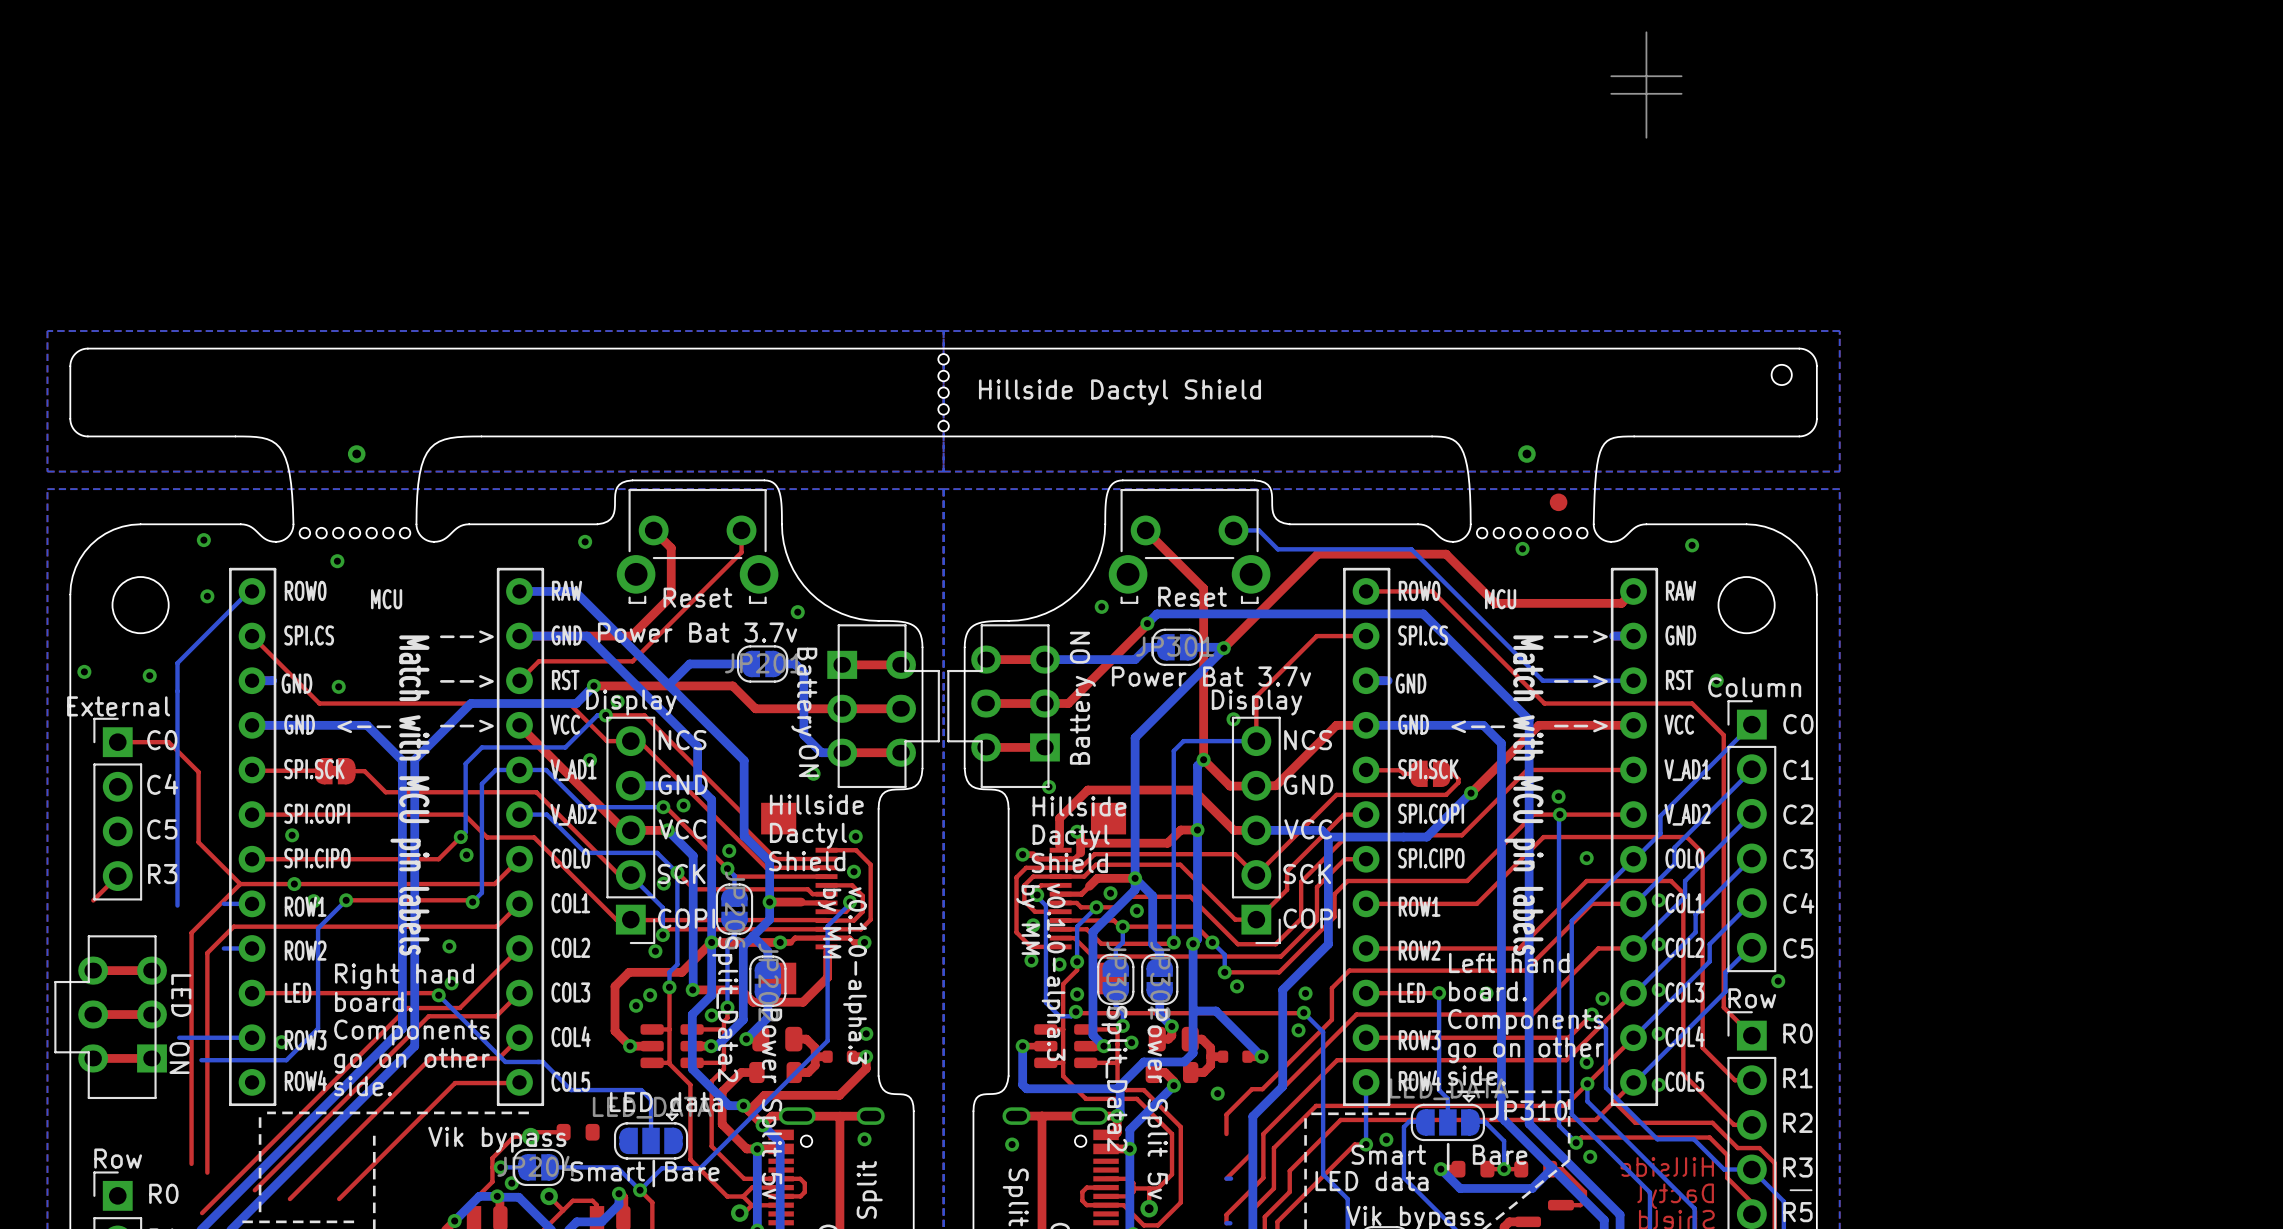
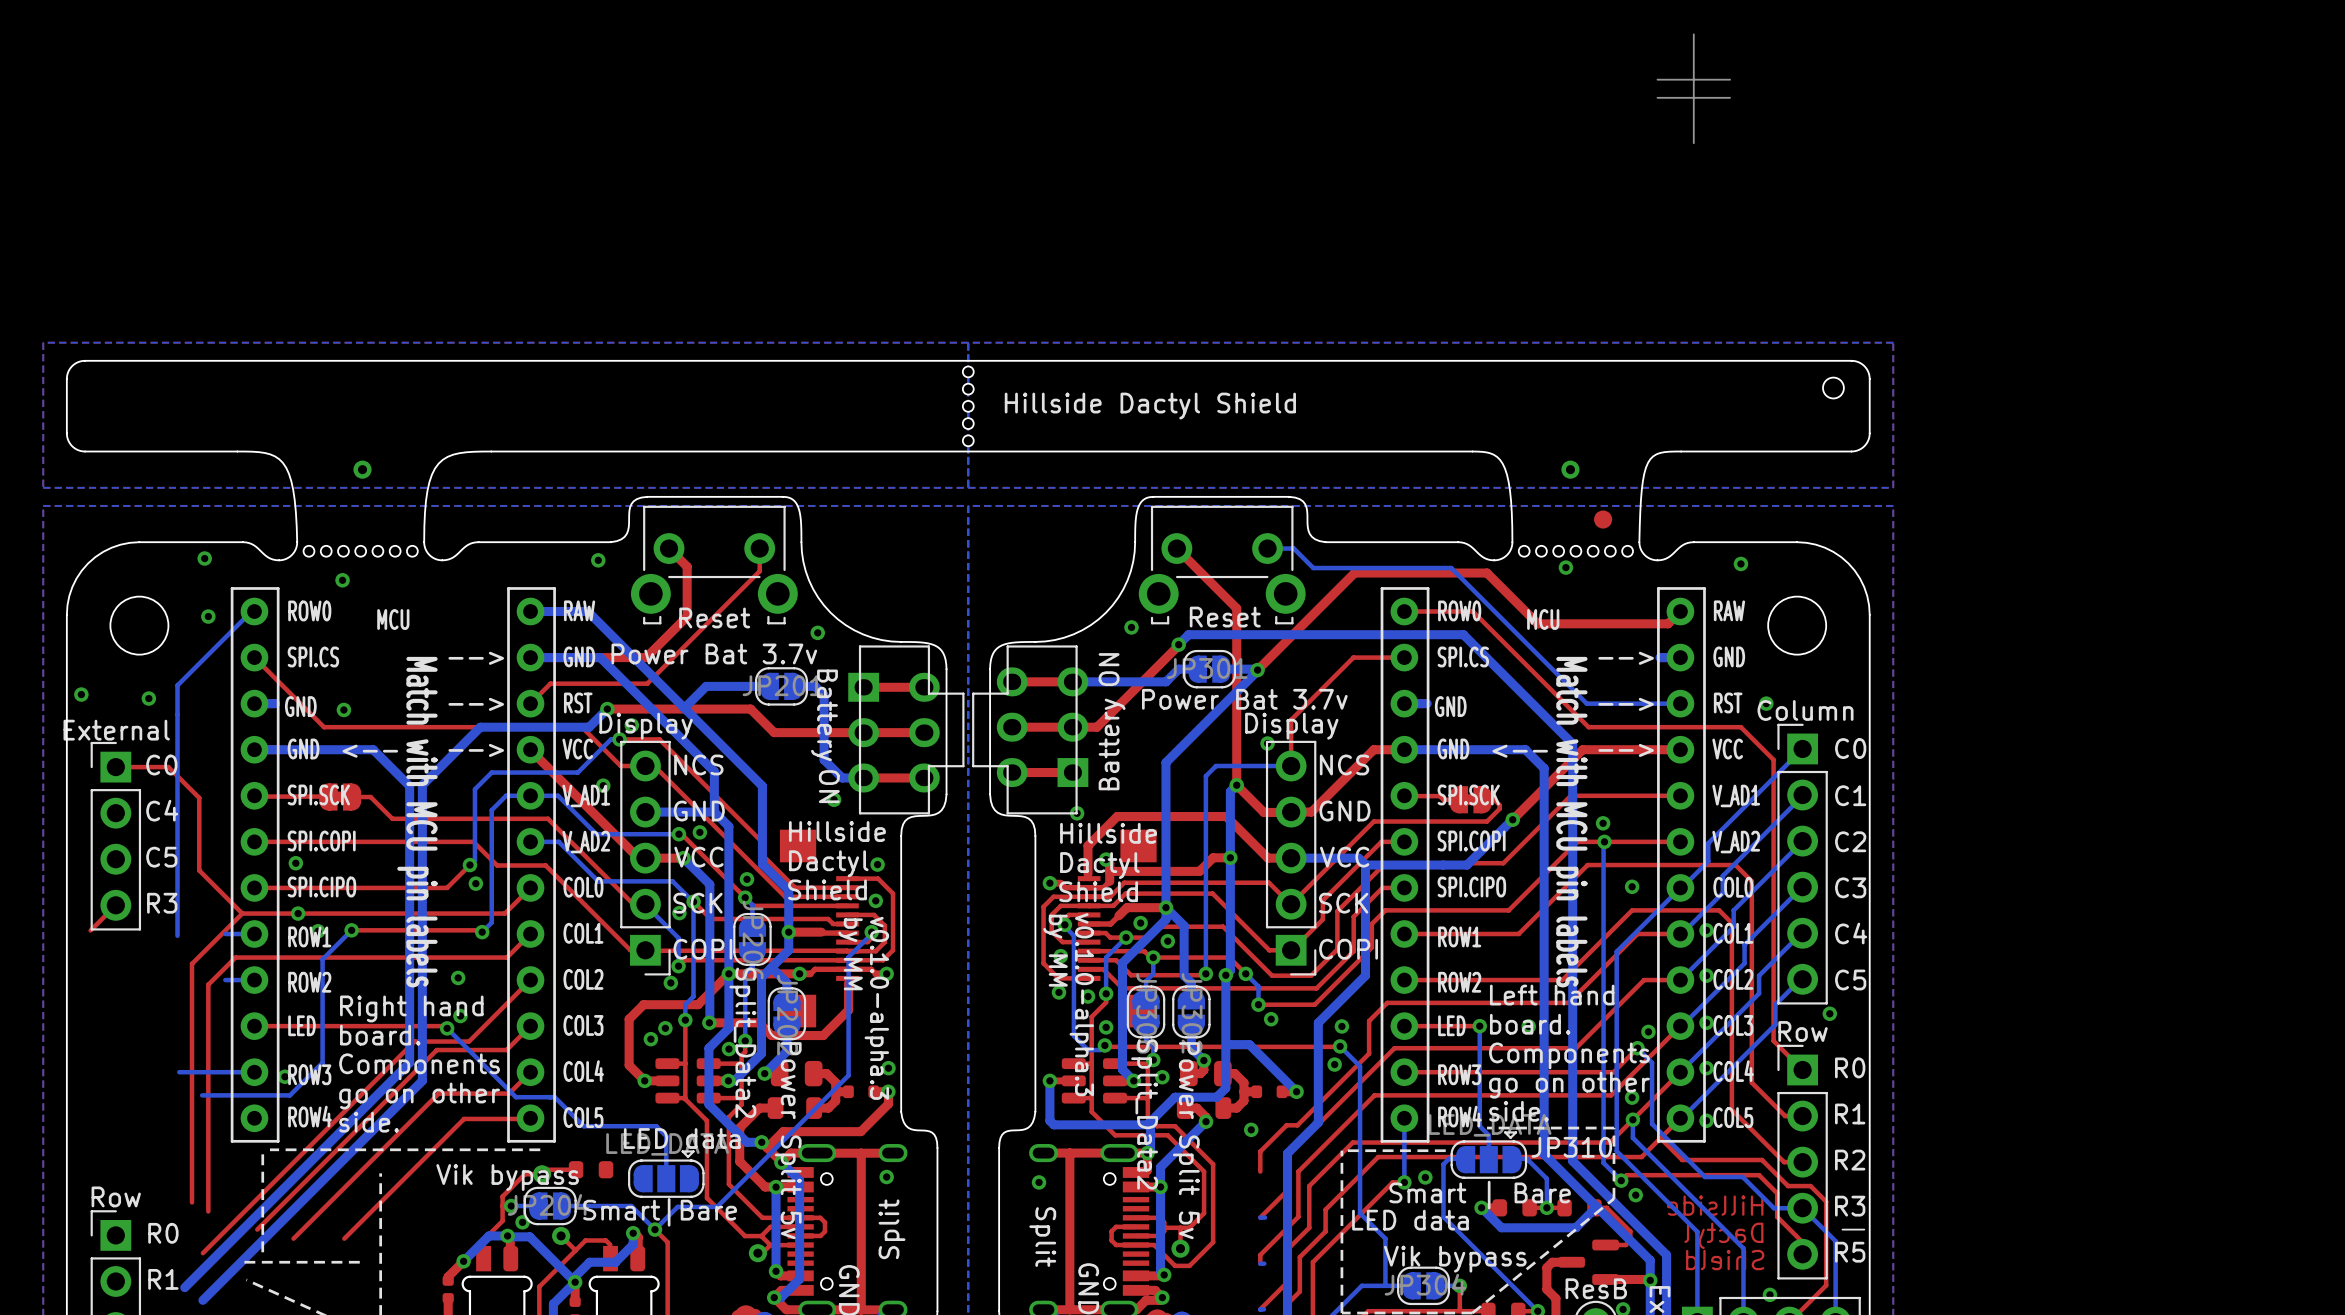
part: (110, 1017) -> none

